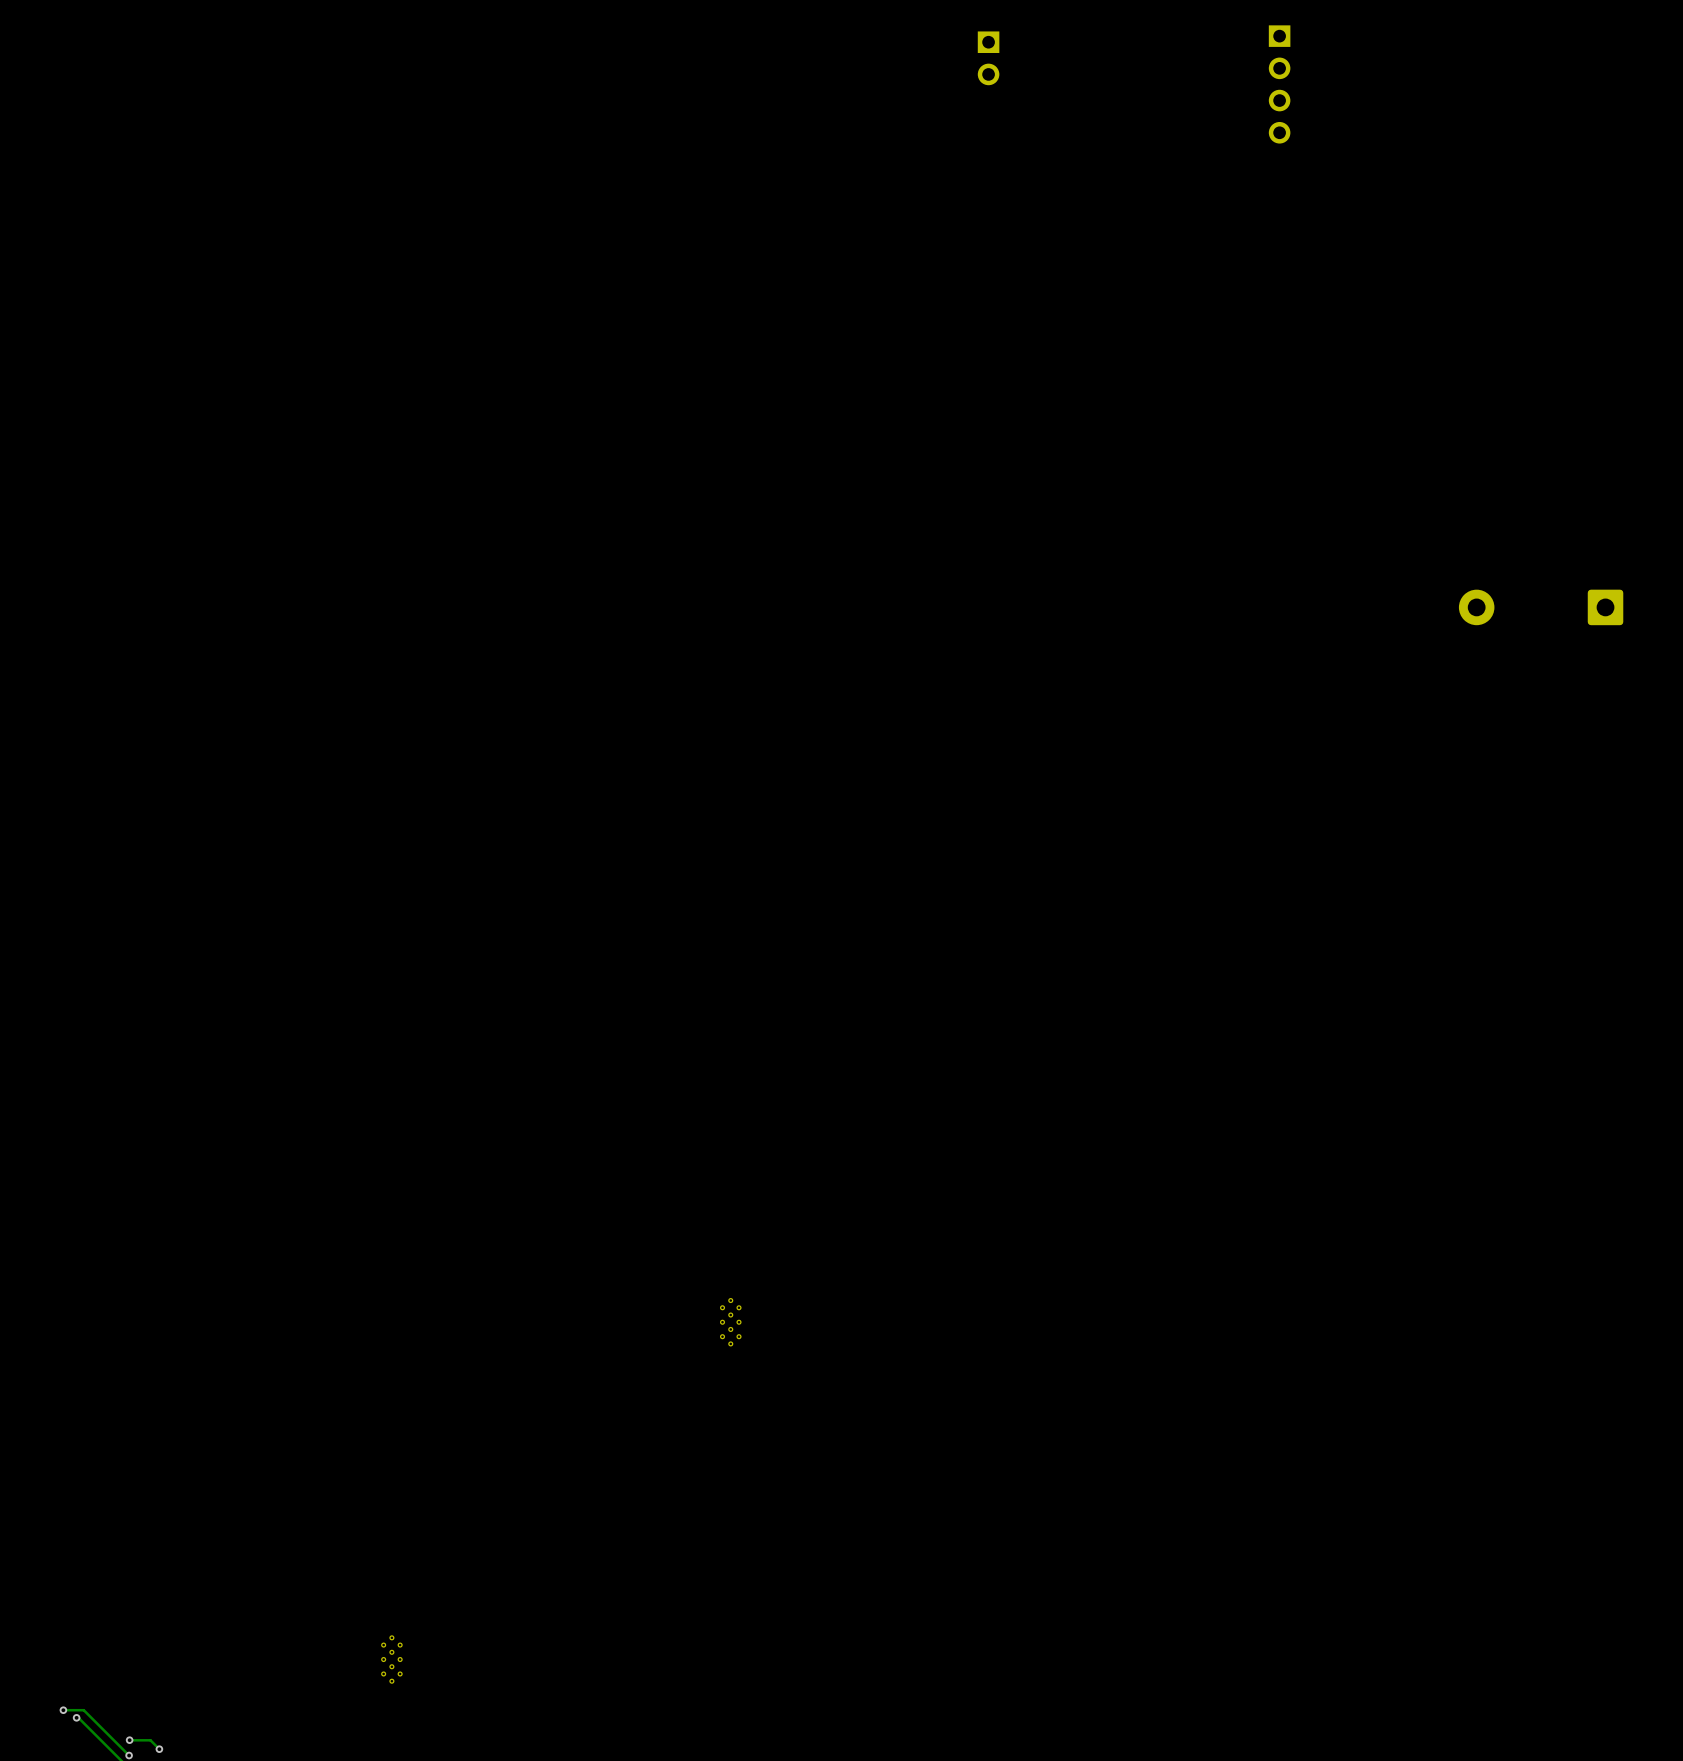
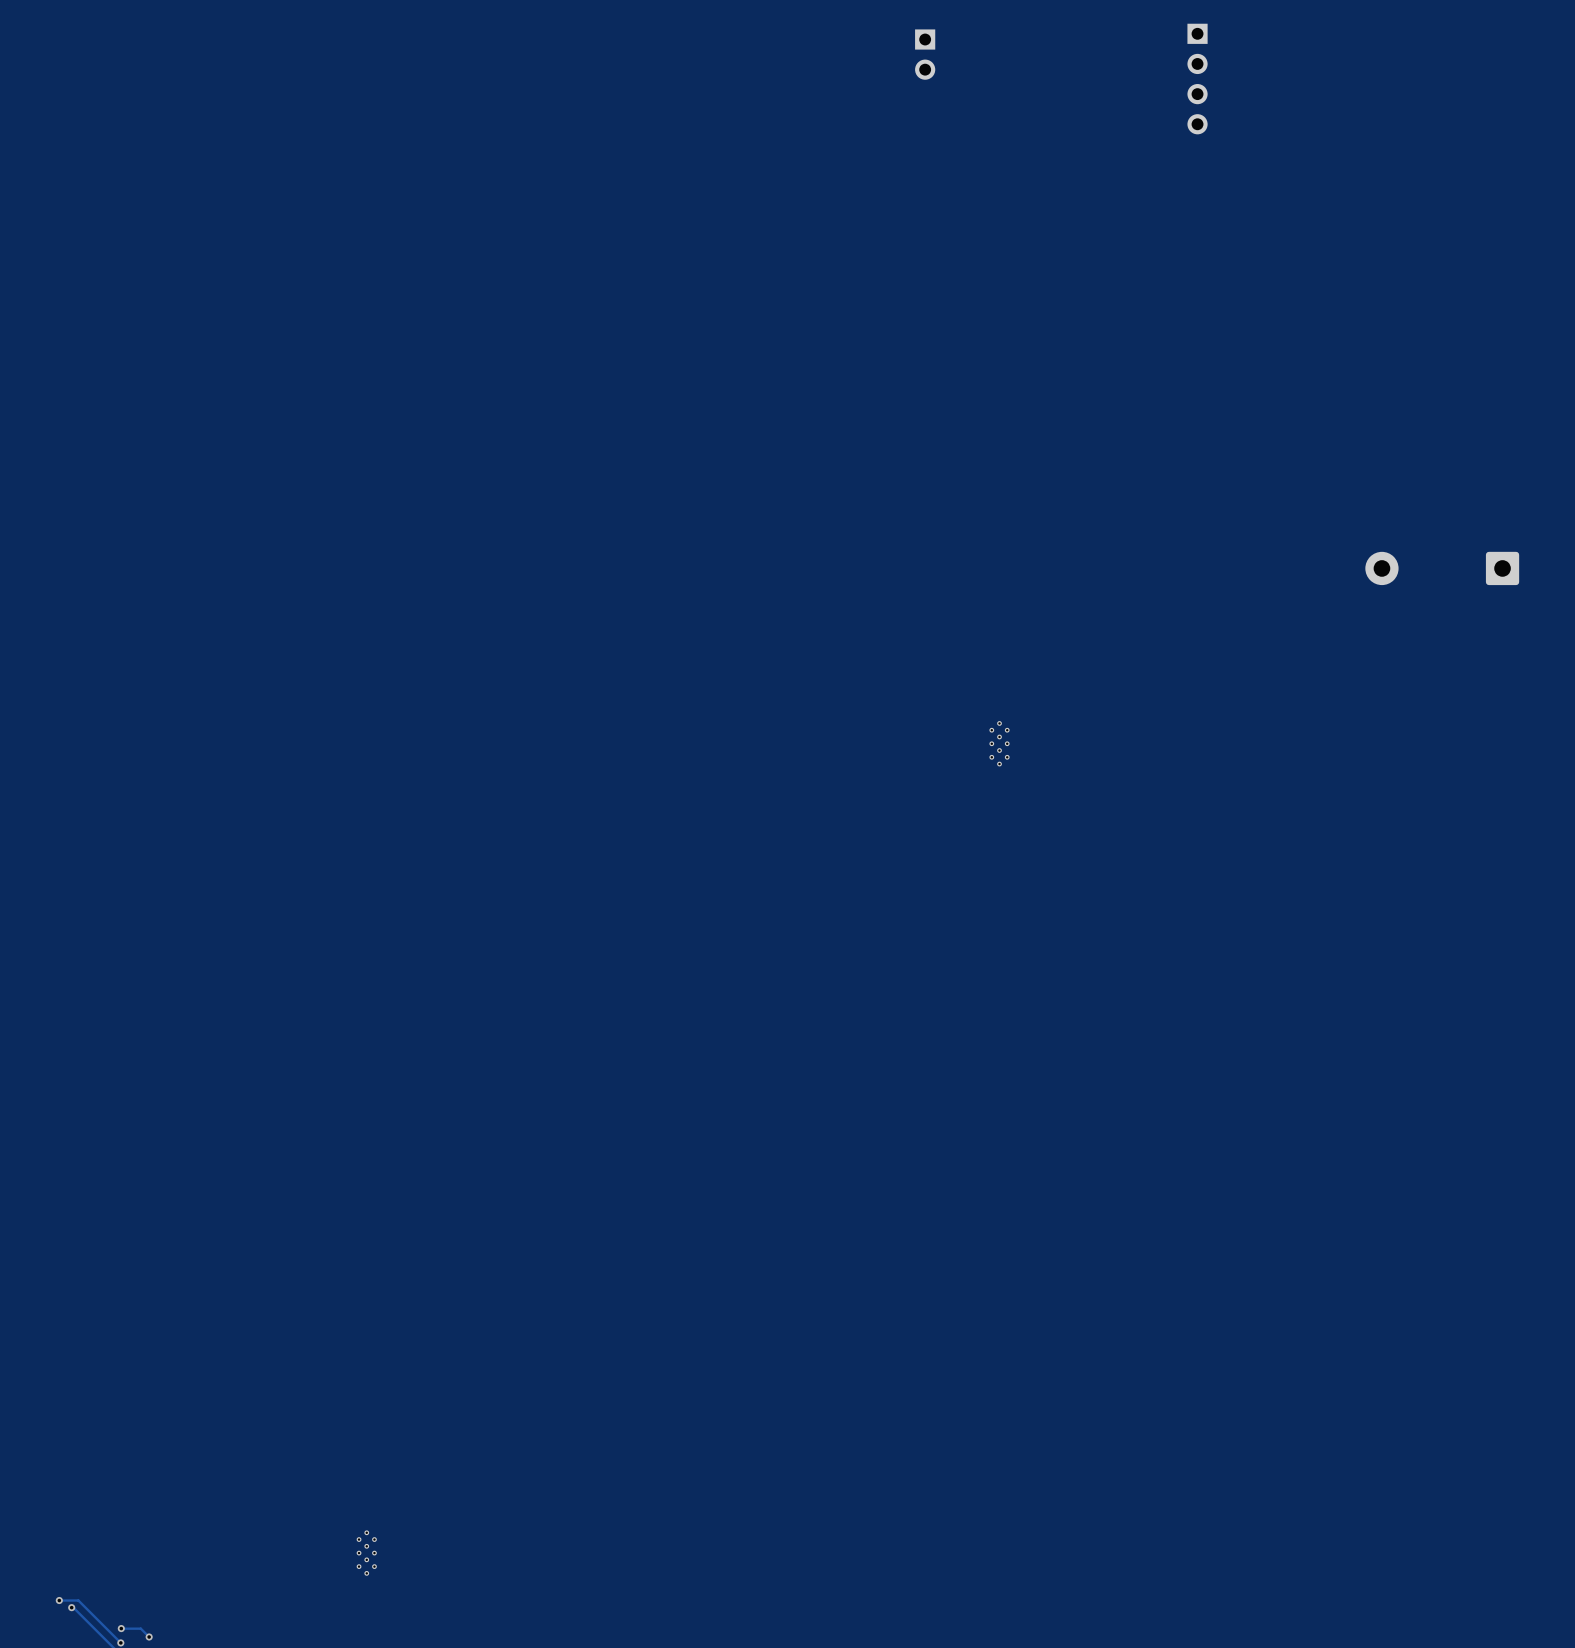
part: none -> (999, 743)
part: (730, 1322) -> none

